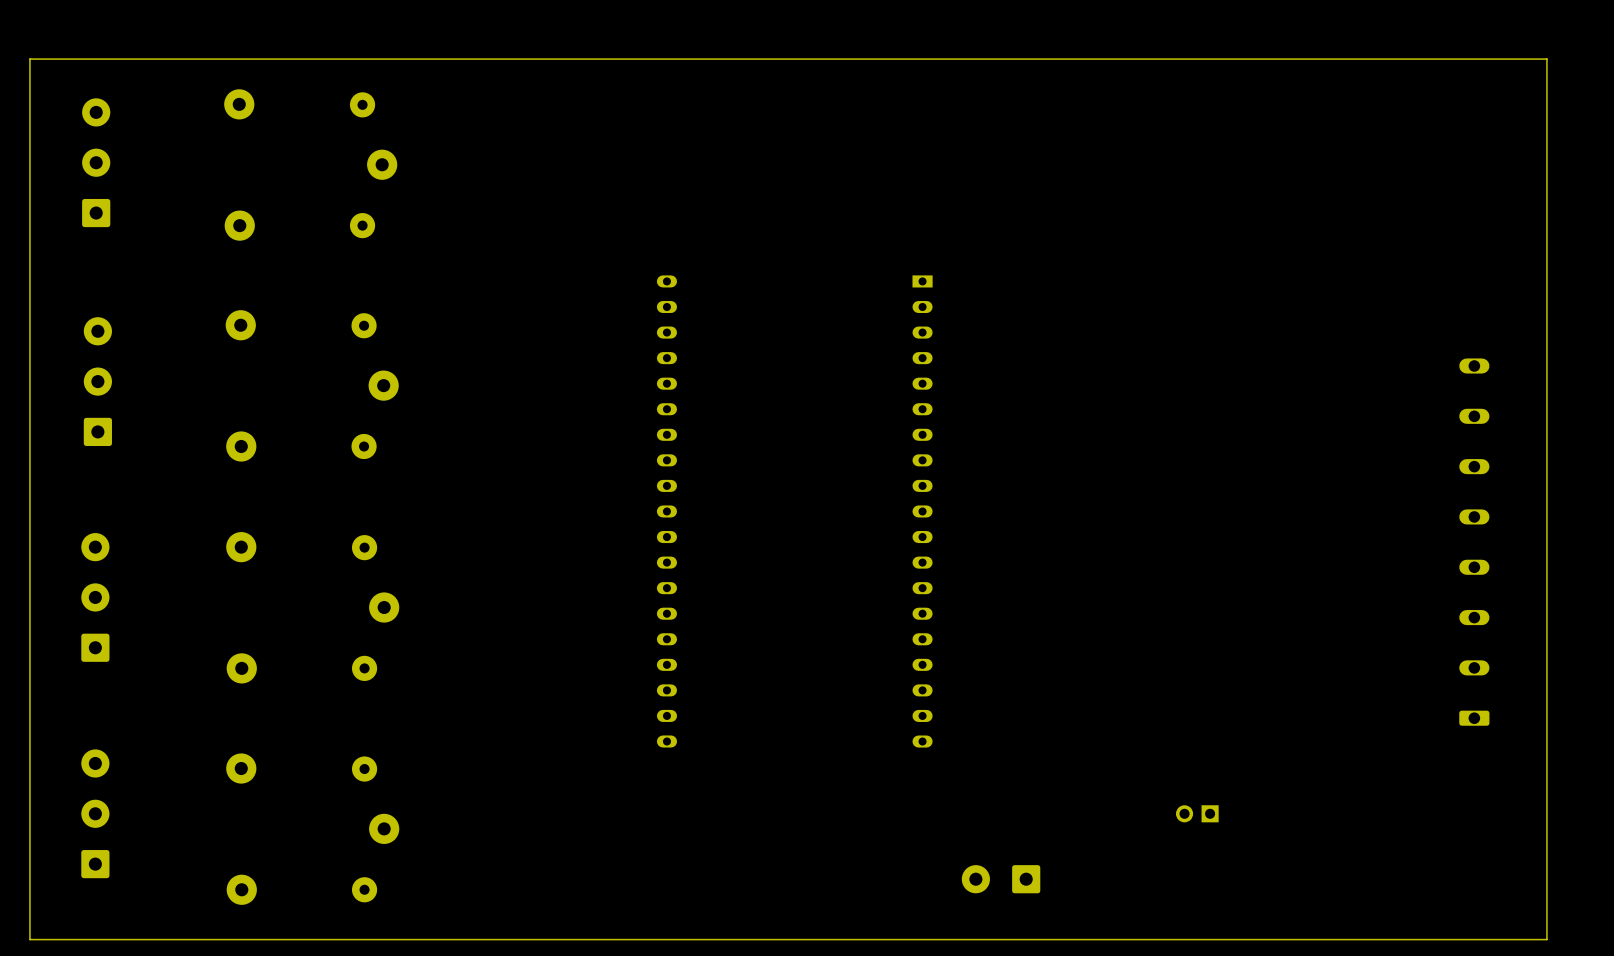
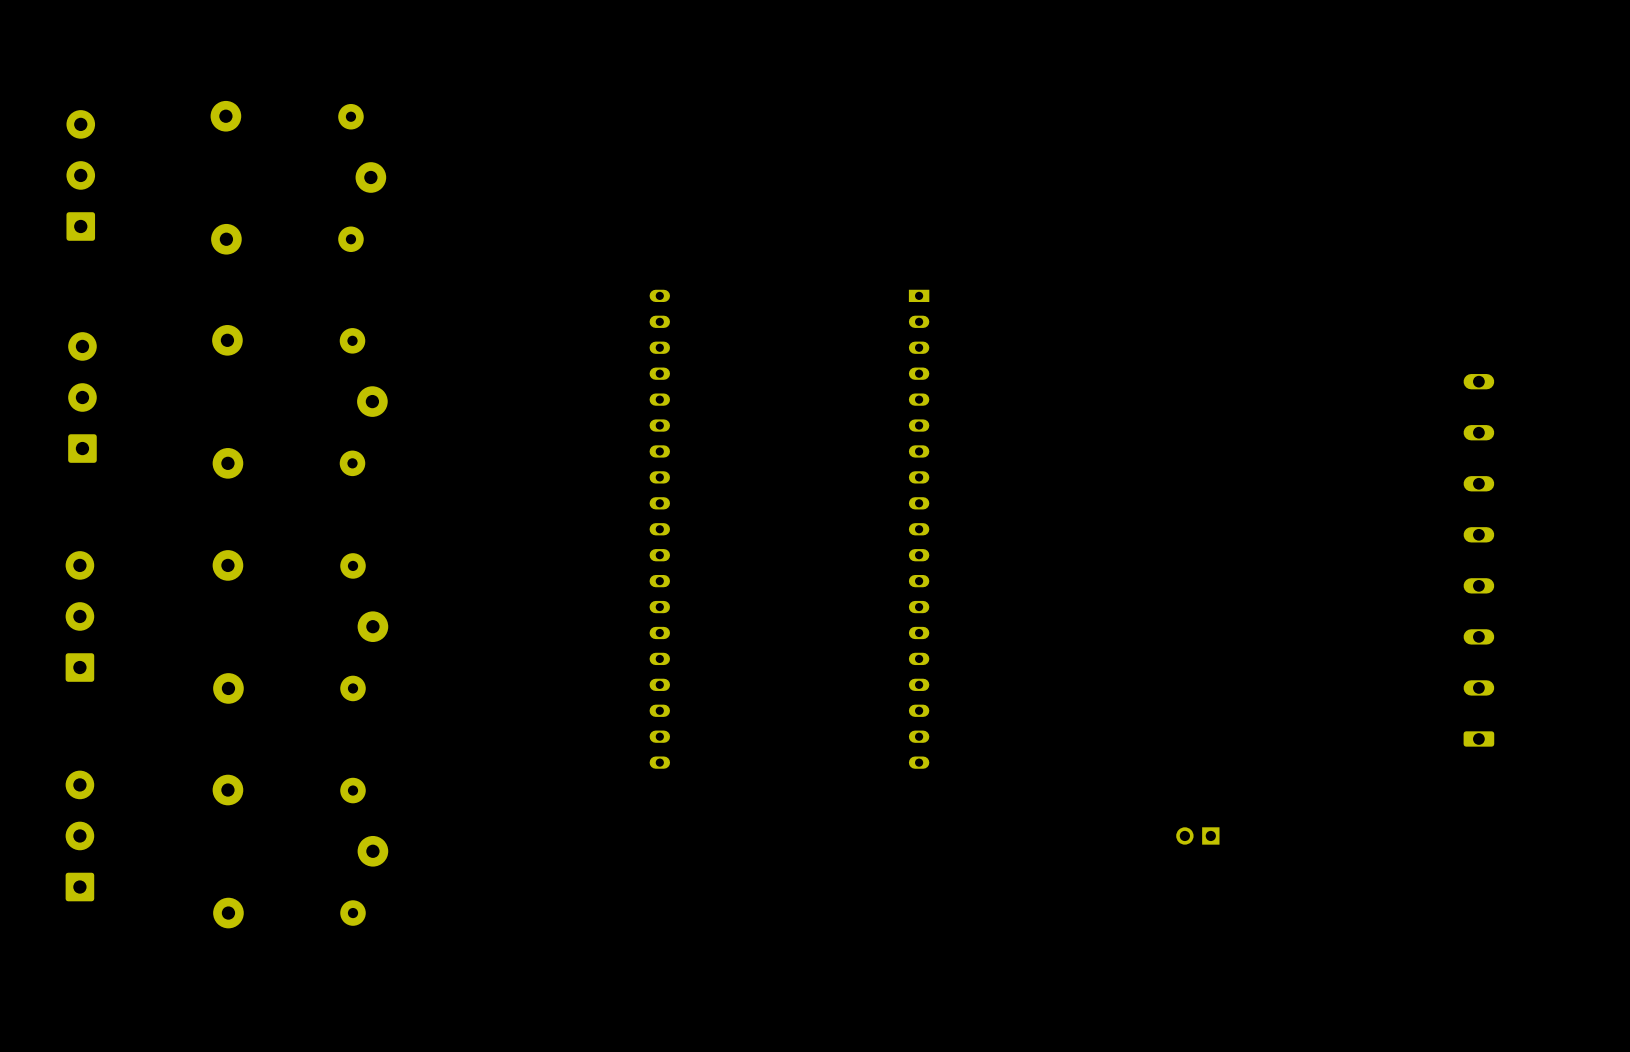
board edge: (1546, 59) (29, 59) (29, 939) (1546, 939) (1546, 59) -> none
part: (1001, 879) -> none

